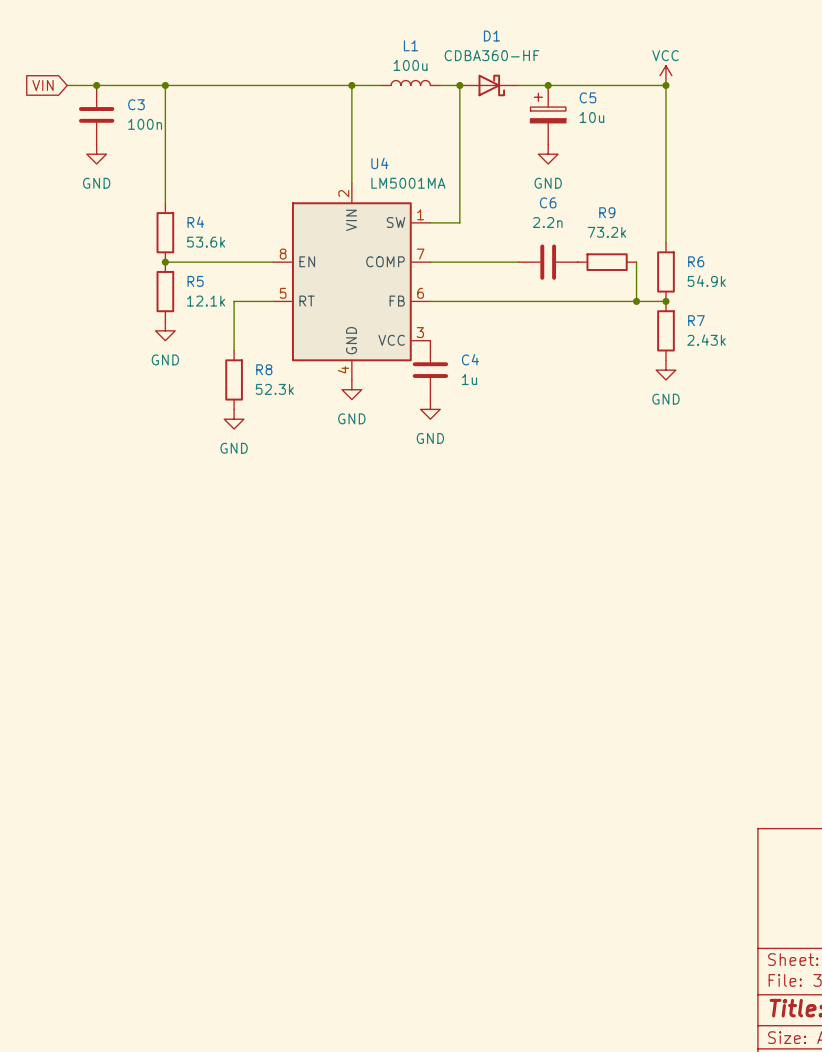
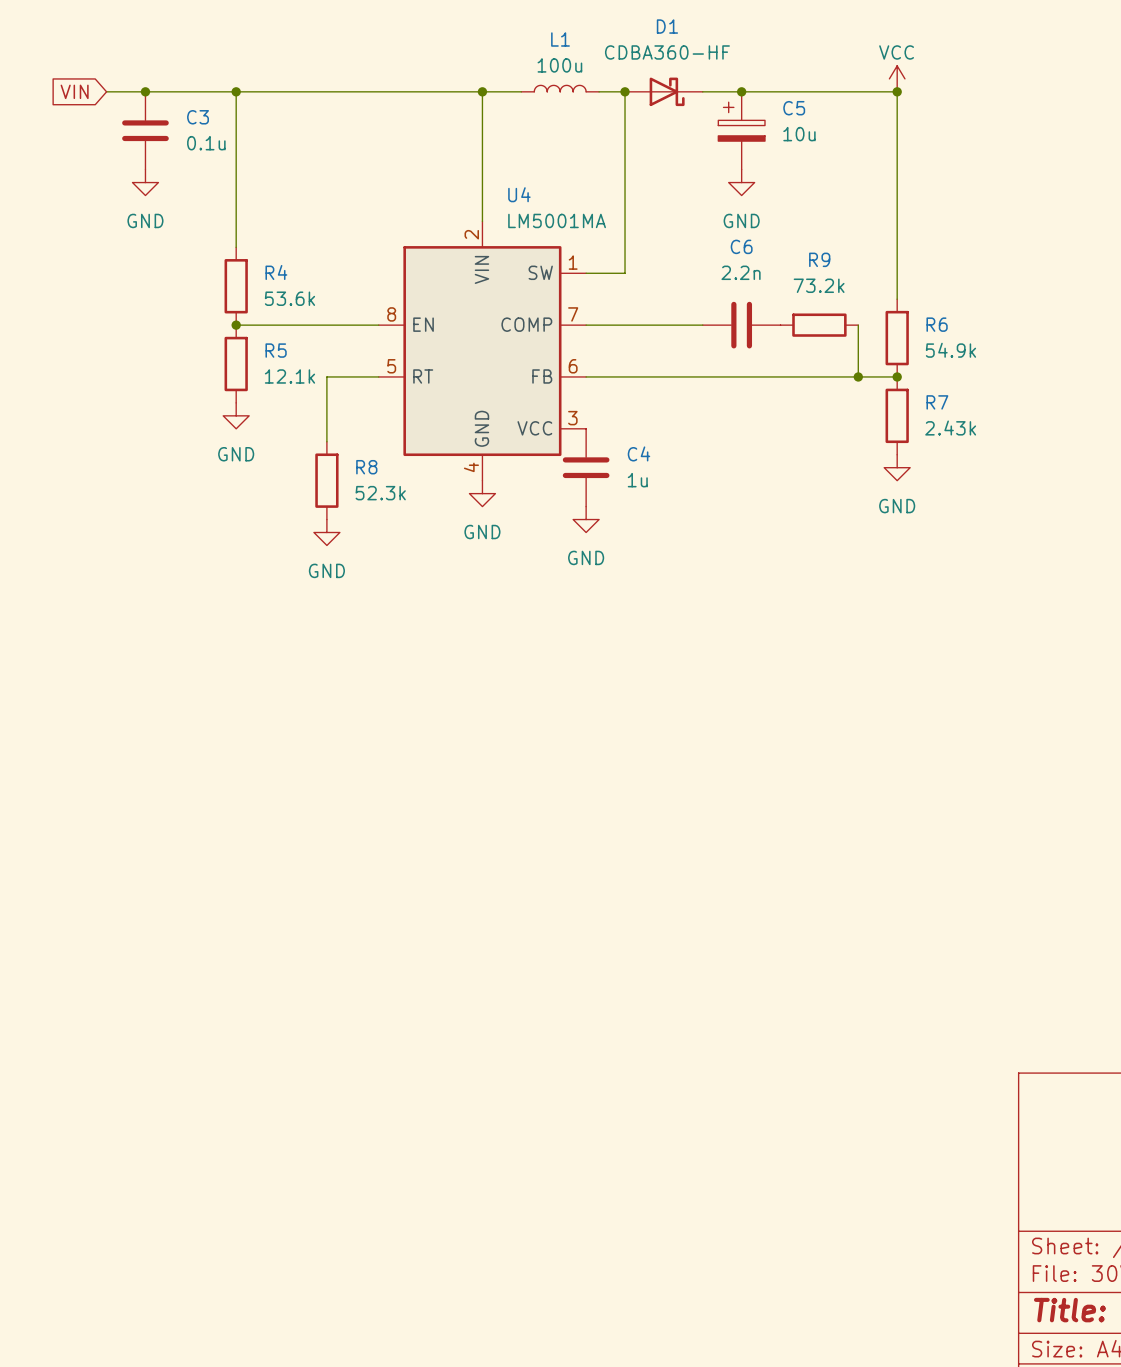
C3 value: 100n (145, 124) -> 0.1u (206, 143)

